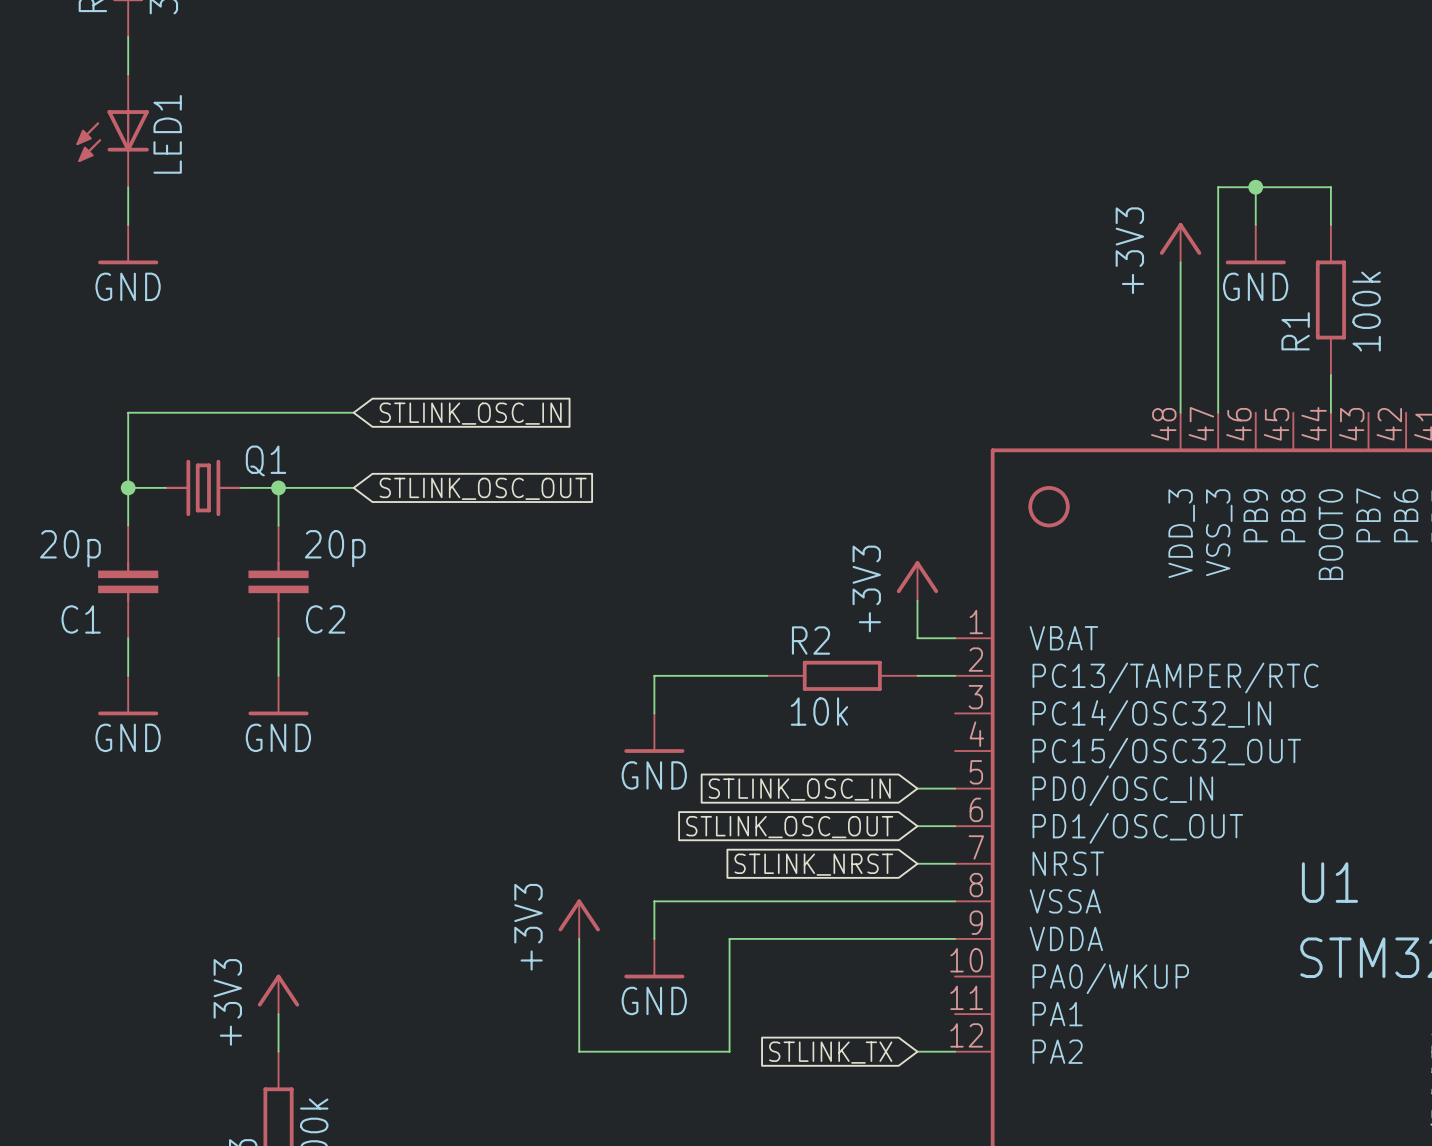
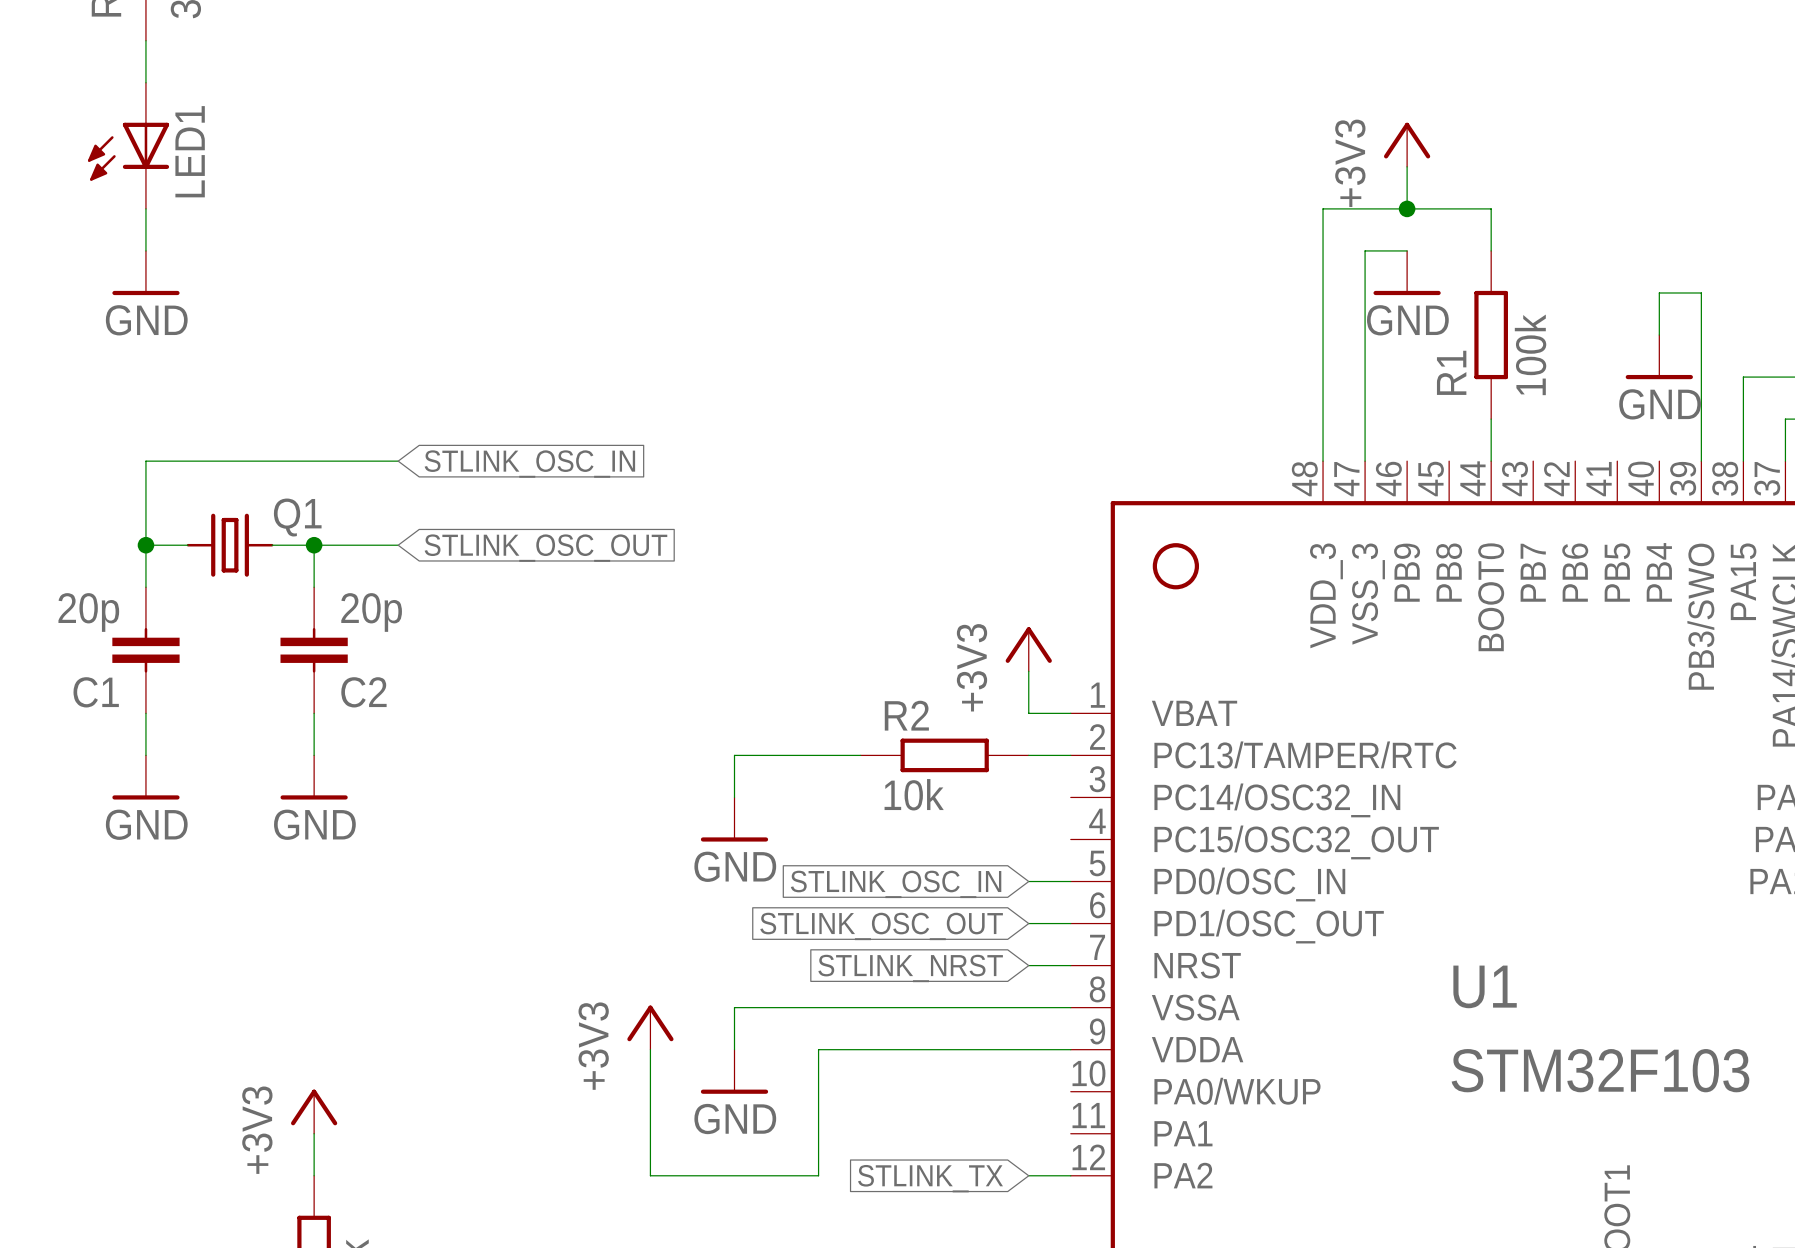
wire: (1218, 187) (1218, 224) -> (1407, 250) (1365, 250)
wire: none -> (1365, 208) (1323, 208) (1323, 292)
wire: (1255, 187) (1255, 224) -> (1407, 208) (1407, 166)
power symbol position: +3V3 (1180, 242) -> +3V3 (1407, 144)

